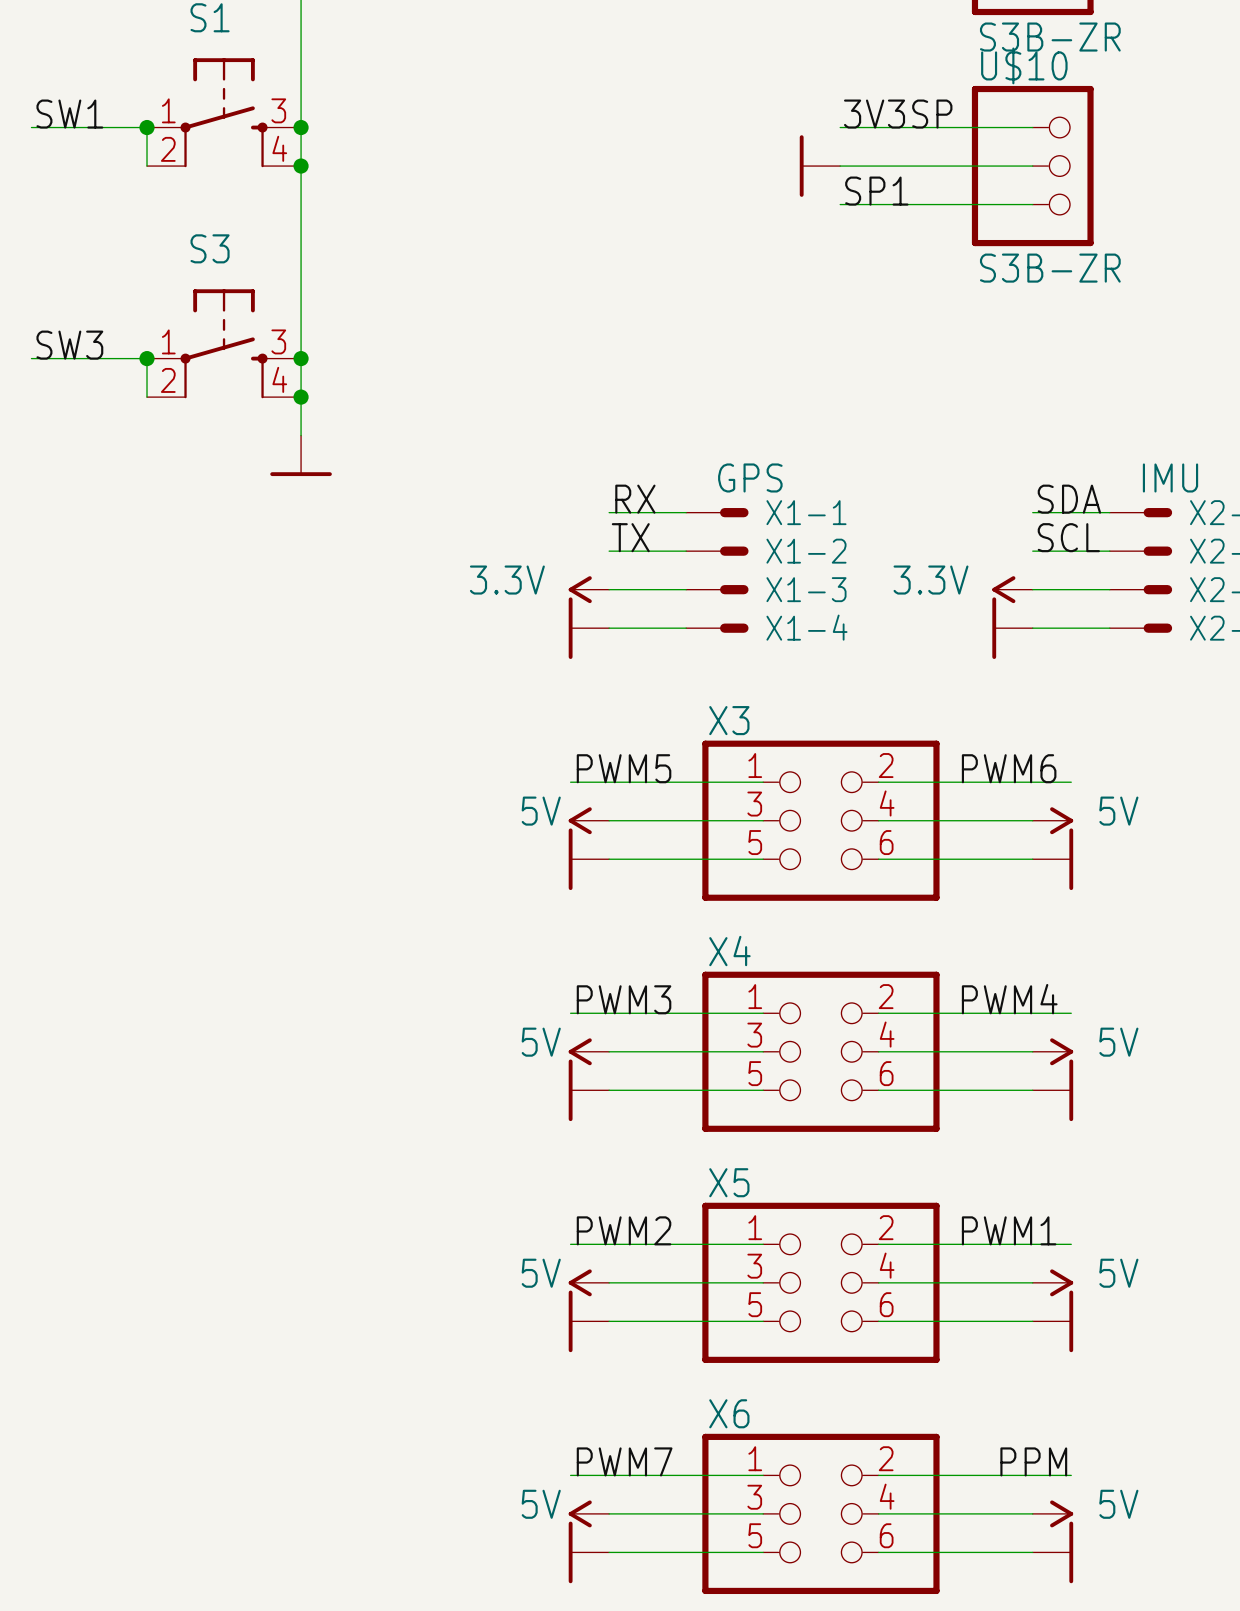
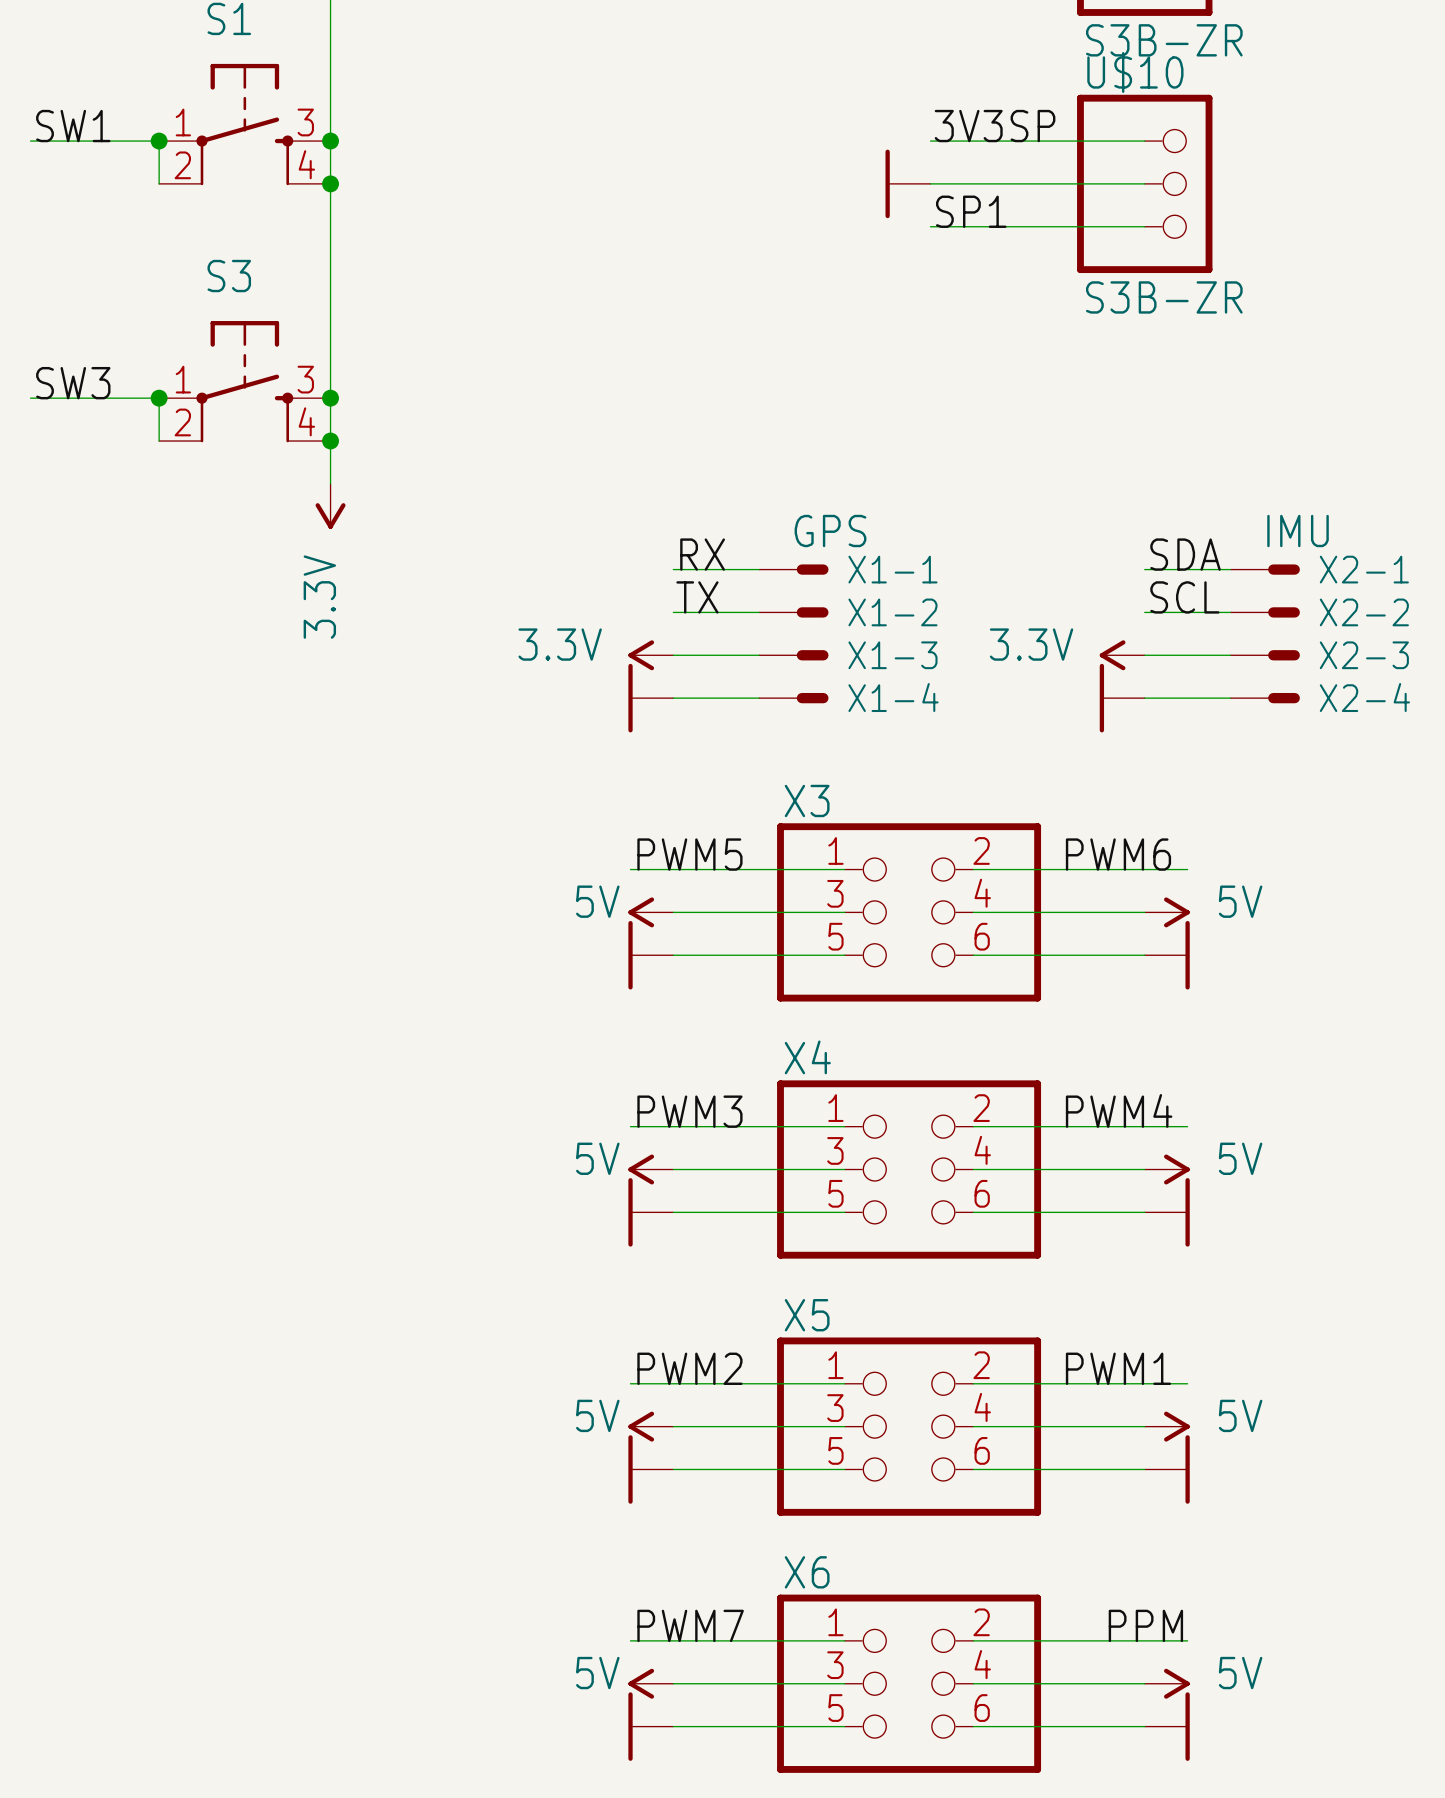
power symbol shape: [270, 435, 332, 477] -> [315, 483, 346, 529]
power symbol text: none -> 3.3V (319, 597)

